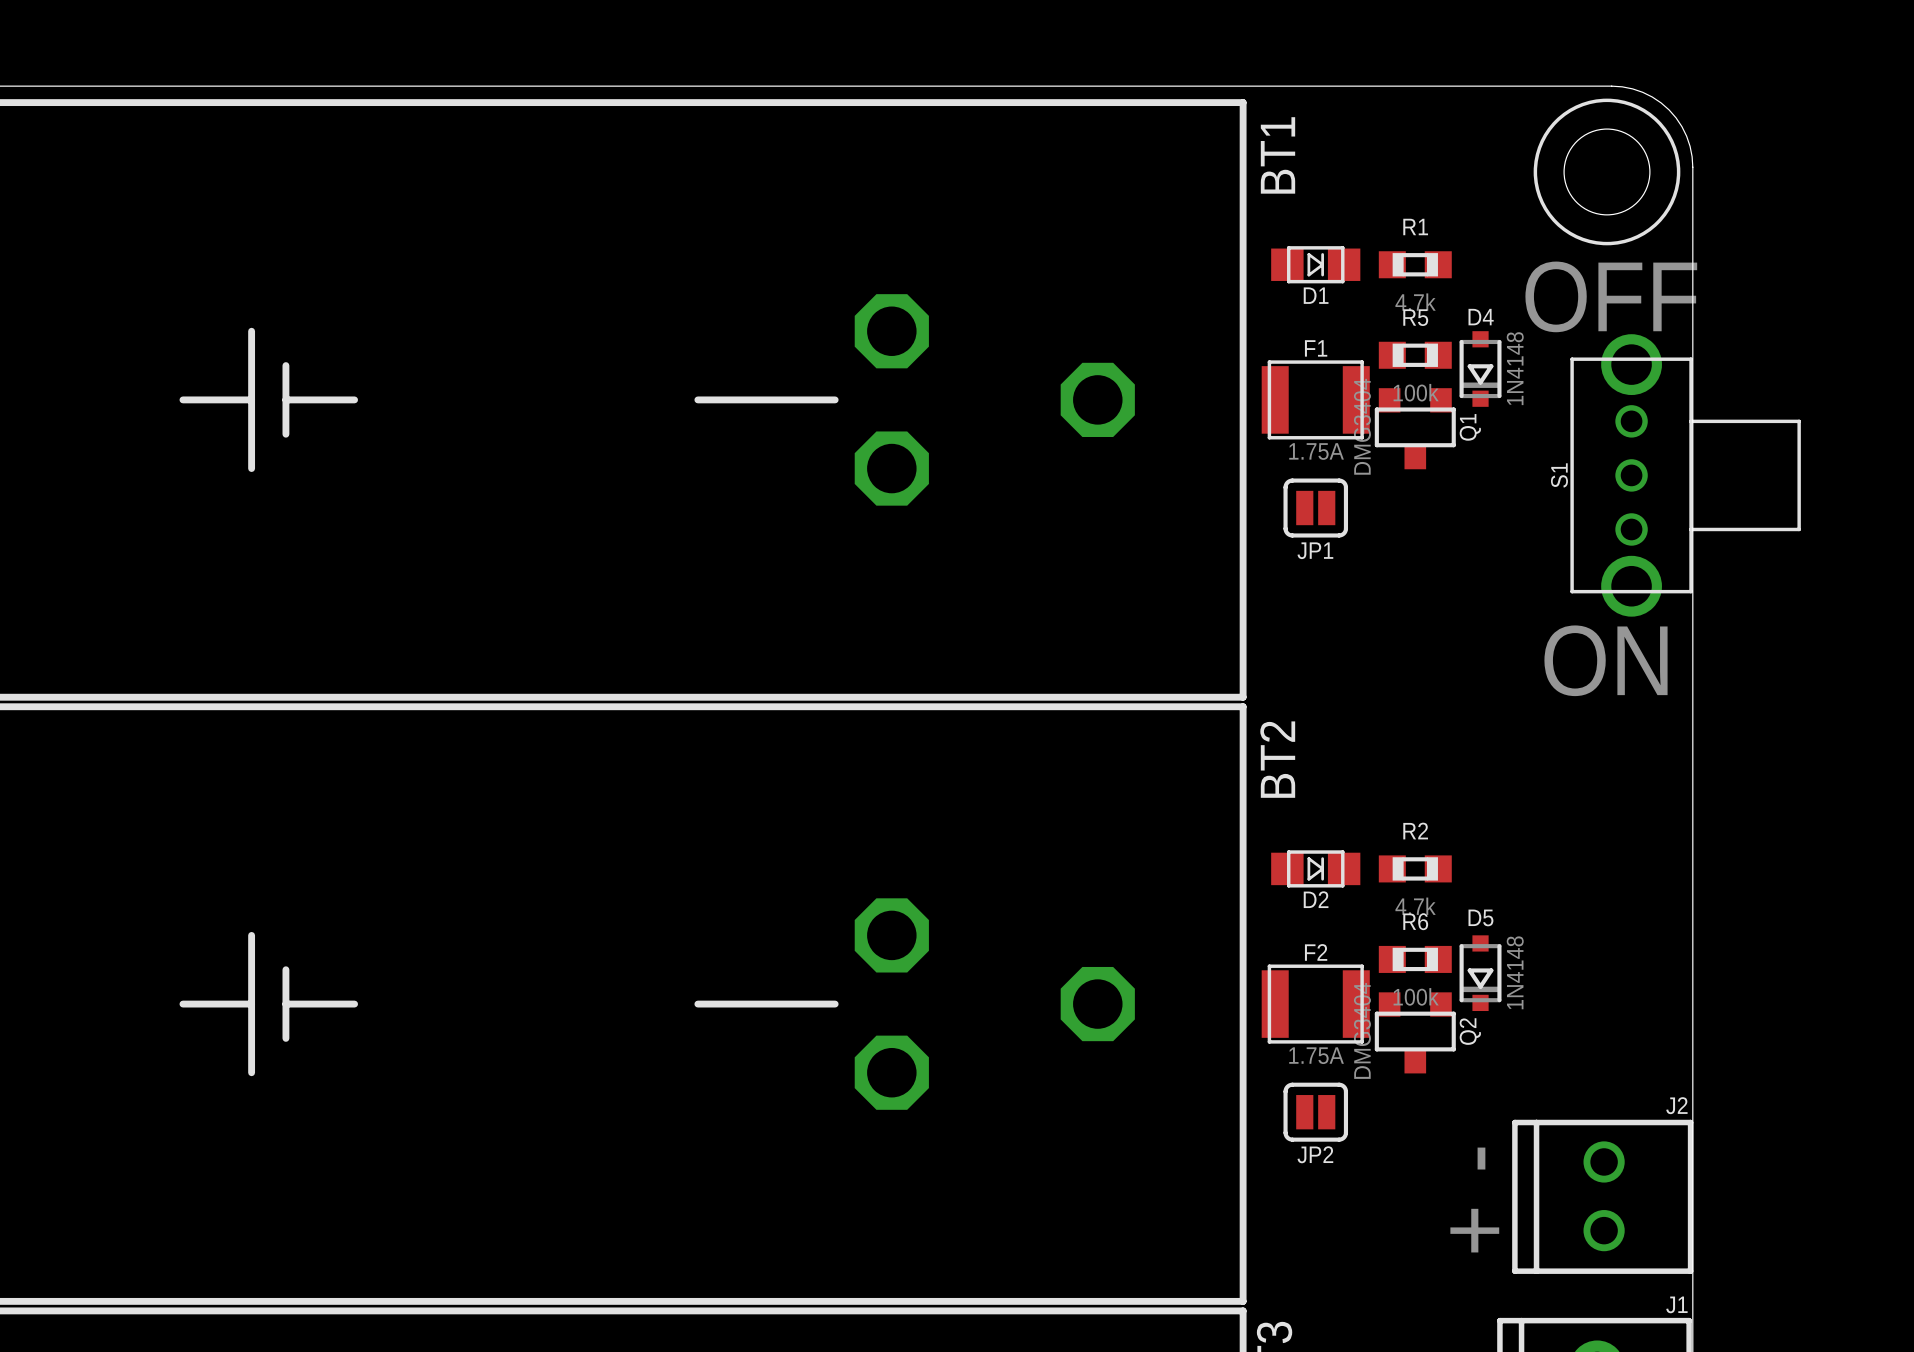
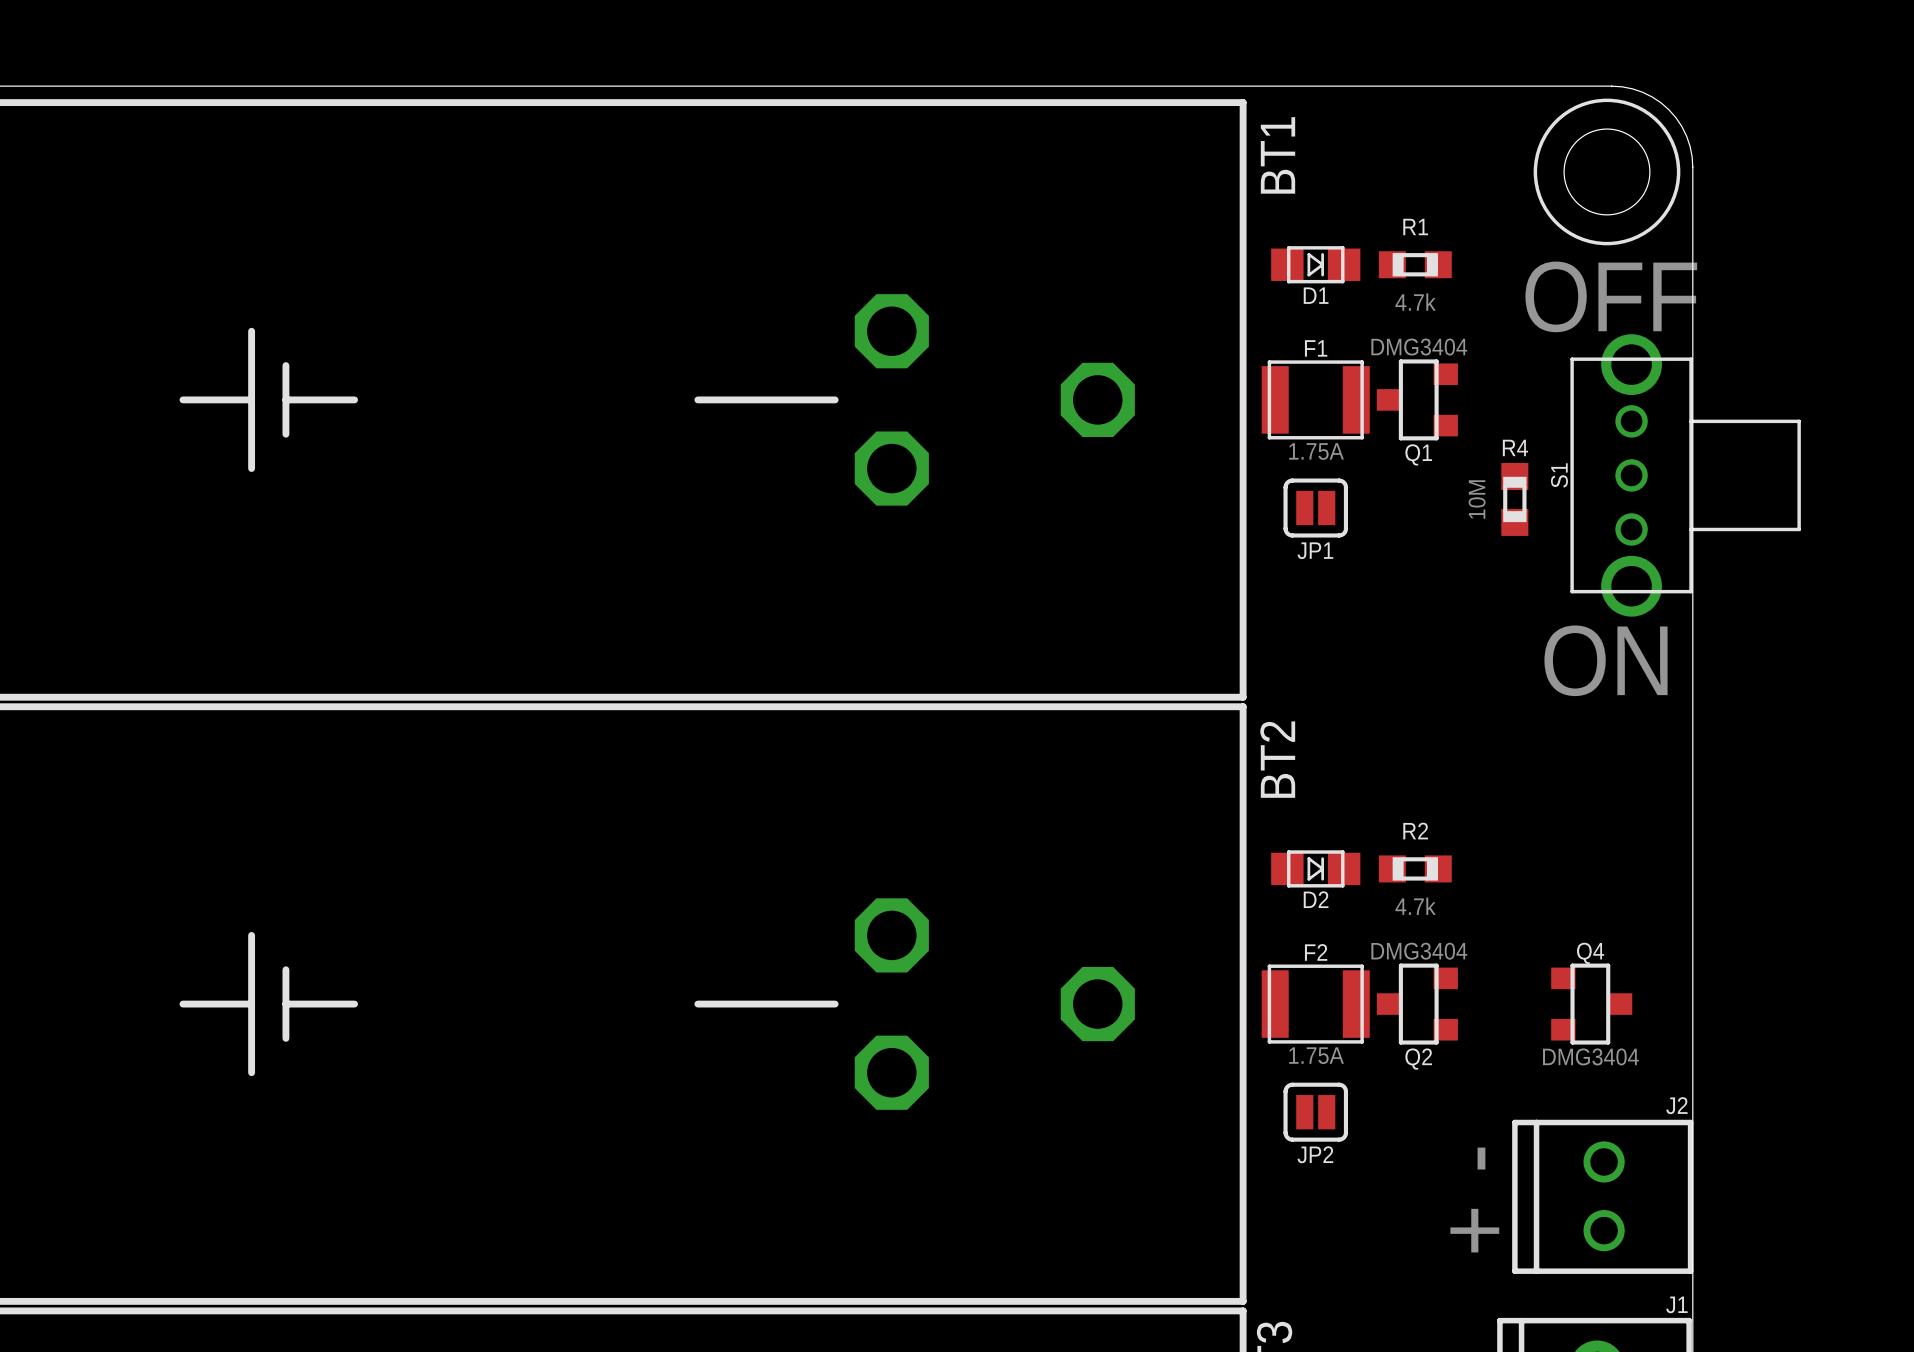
R5: 100k (1415, 355) -> none
D4: 1N4148 (1480, 369) -> none
Q1 rotation: 0° (1415, 428) -> 90° clockwise (1417, 399)
R4: none -> 10M (1514, 499)
R6: 100k (1415, 959) -> none
D5: 1N4148 (1480, 973) -> none
Q4: none -> DMG3404 (1591, 1004)
Q2 rotation: 0° (1415, 1032) -> 90° clockwise (1417, 1004)

